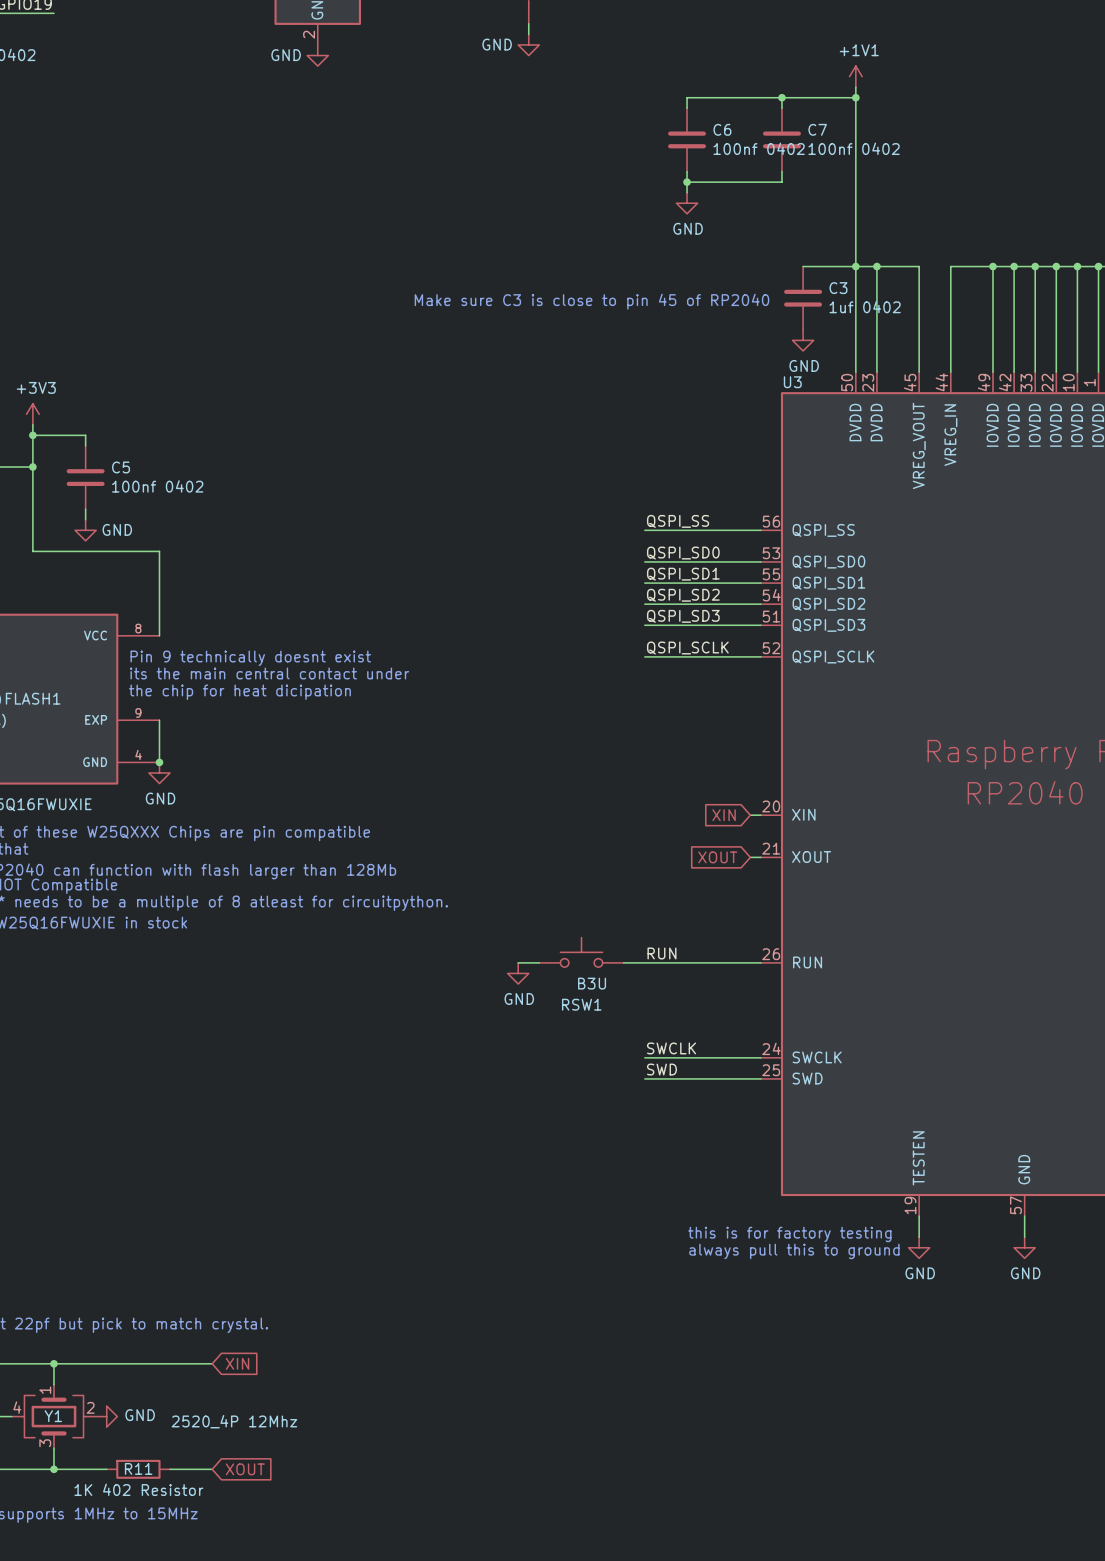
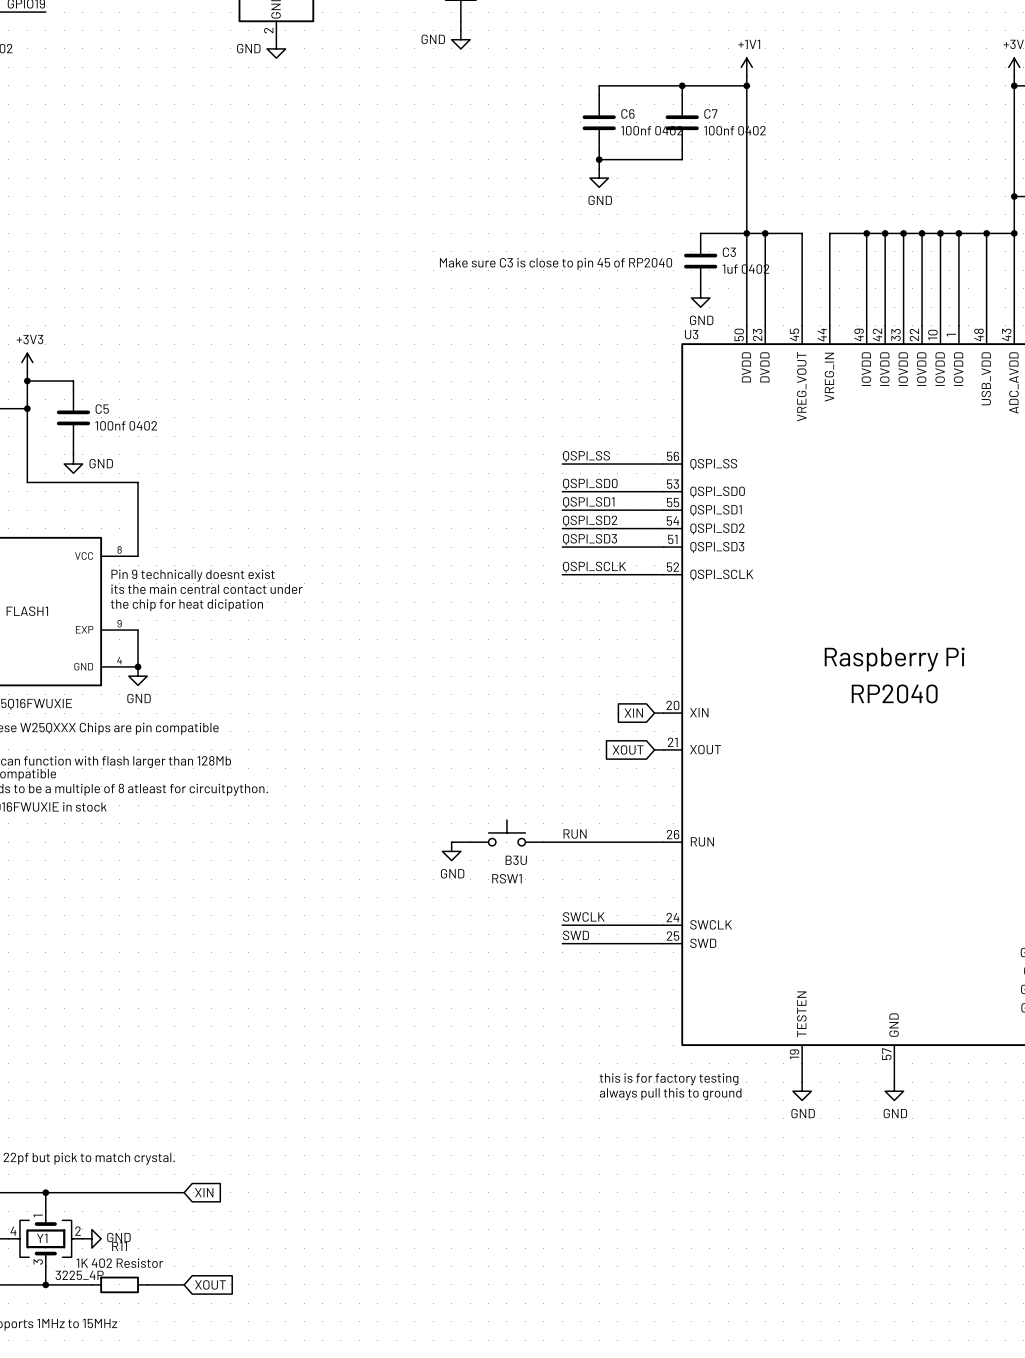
Y1 value: 2520_4P 12Mhz (234, 1421) -> 3225_4P (79, 1275)
R11 name position: R11 (138, 1468) -> R11 (119, 1246)
R11 value position: 1K 402 Resistor (138, 1489) -> 1K 402 Resistor (119, 1263)

